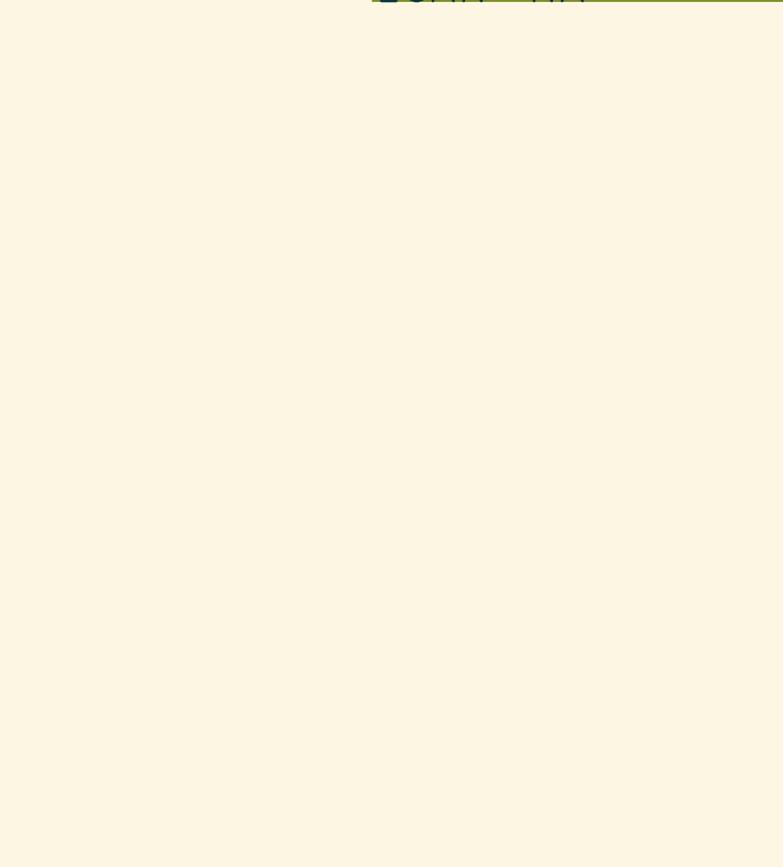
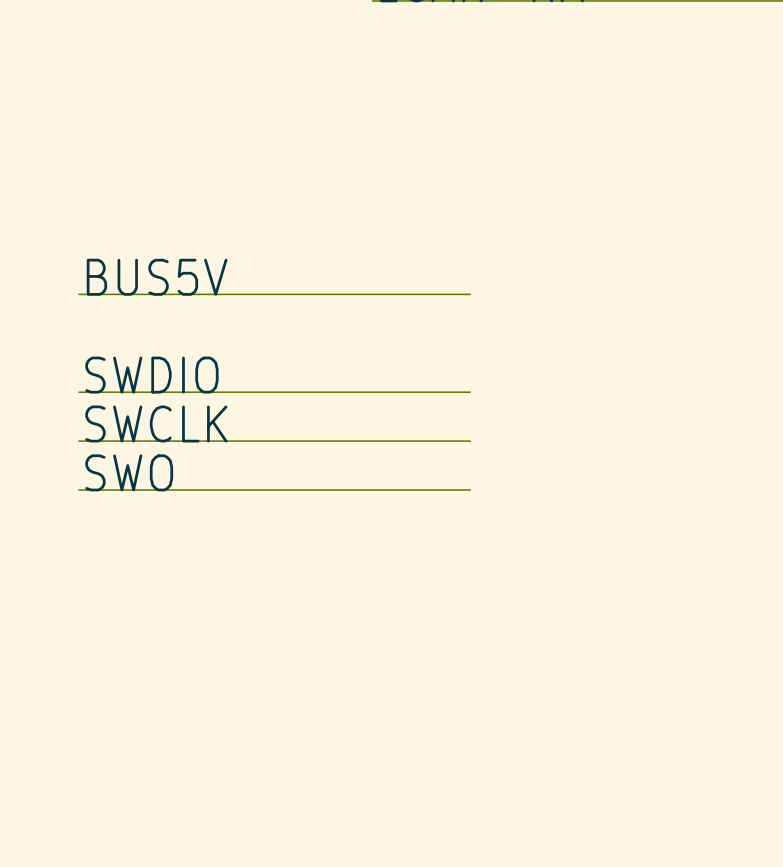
label: none -> BUS5V (157, 277)
wire: none -> (78, 294) (470, 294)
label: none -> SWDIO (151, 375)
wire: none -> (78, 392) (470, 392)
label: none -> SWCLK (156, 423)
wire: none -> (78, 441) (470, 441)
label: none -> SWO (129, 472)
wire: none -> (78, 490) (470, 490)

